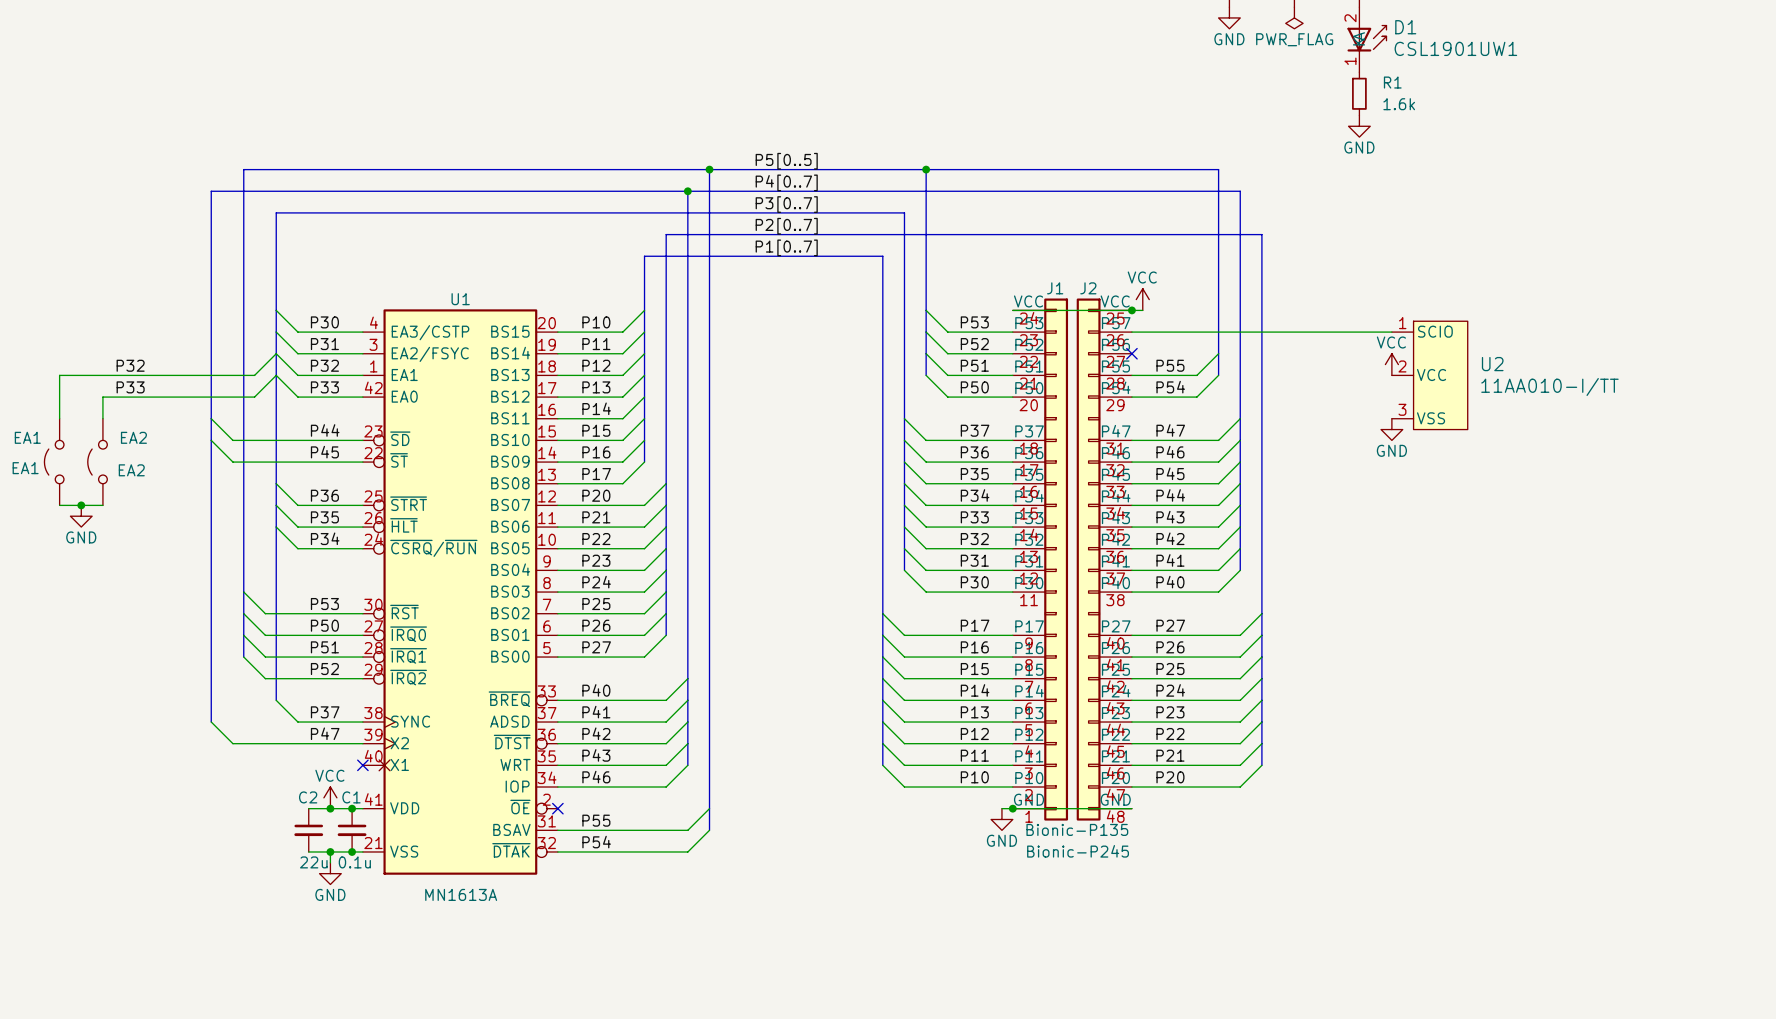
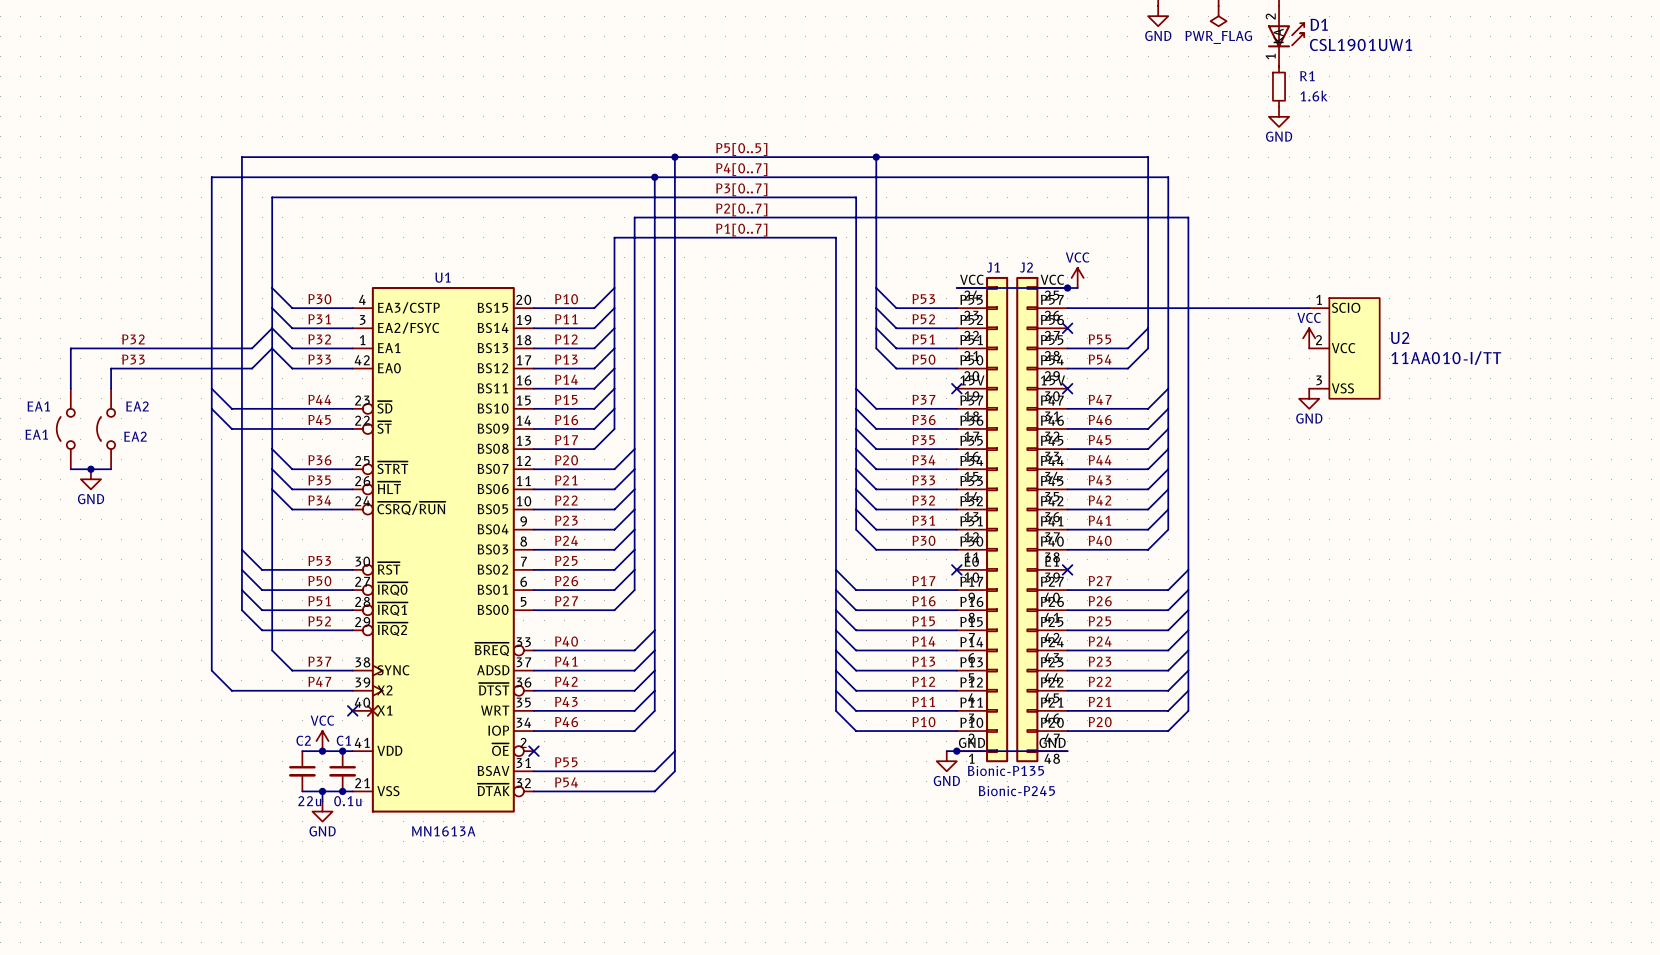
J1 symbol: [1012, 298, 1069, 821] -> [956, 276, 1009, 763]
J2 symbol: [1076, 298, 1132, 821] -> [1016, 276, 1068, 763]
no-connect mark: none -> (956, 388)
no-connect mark: none -> (1067, 388)
no-connect mark: none -> (956, 569)
no-connect mark: none -> (1067, 569)

